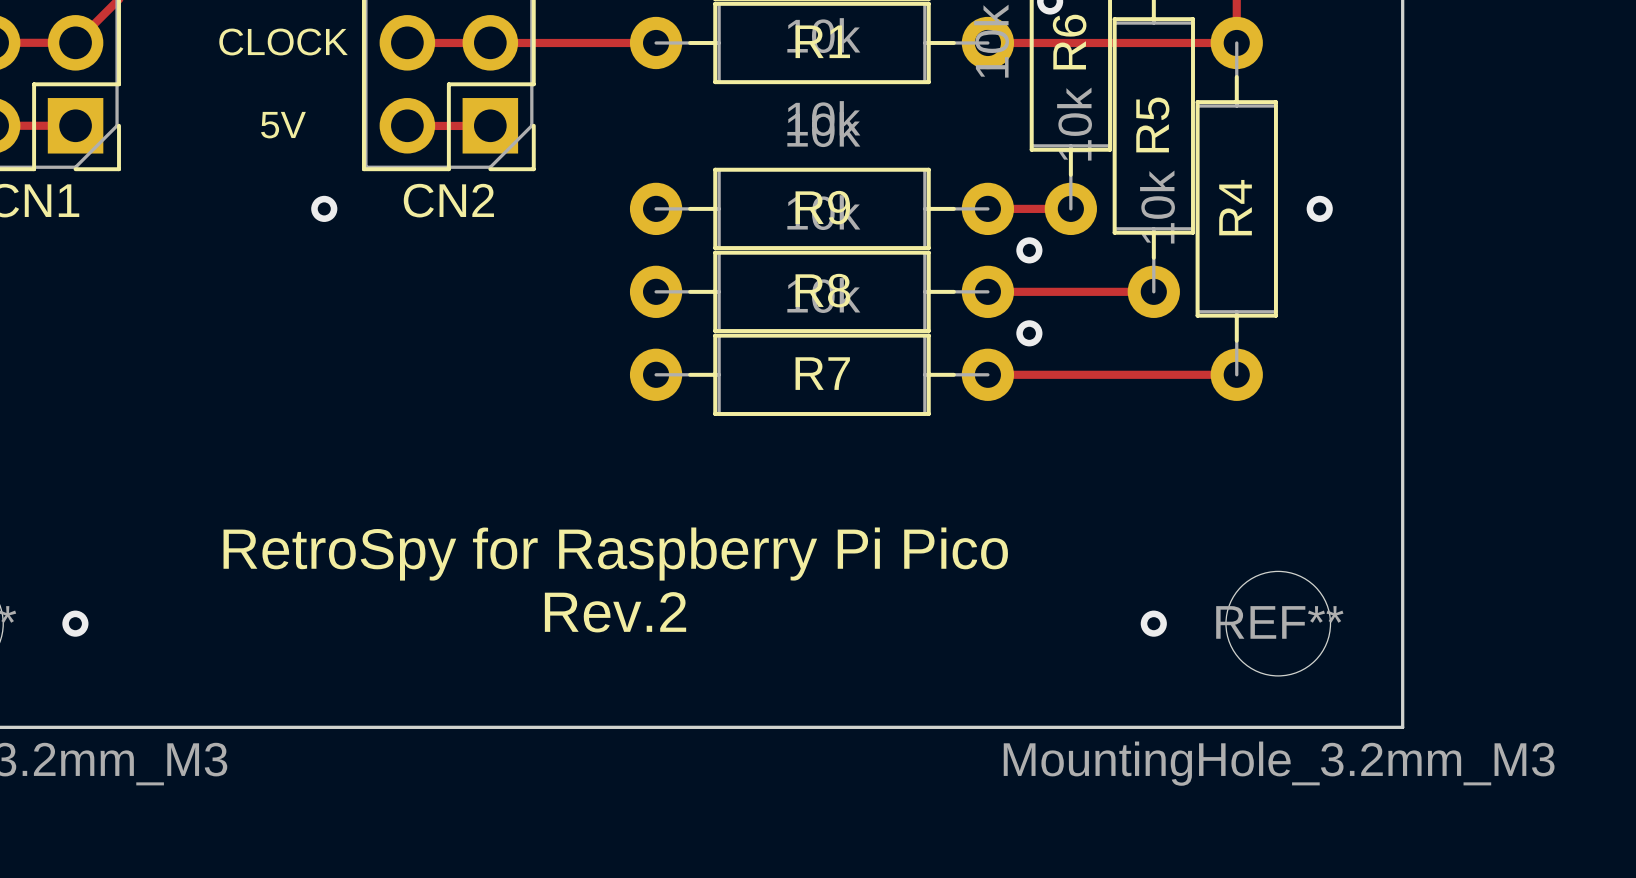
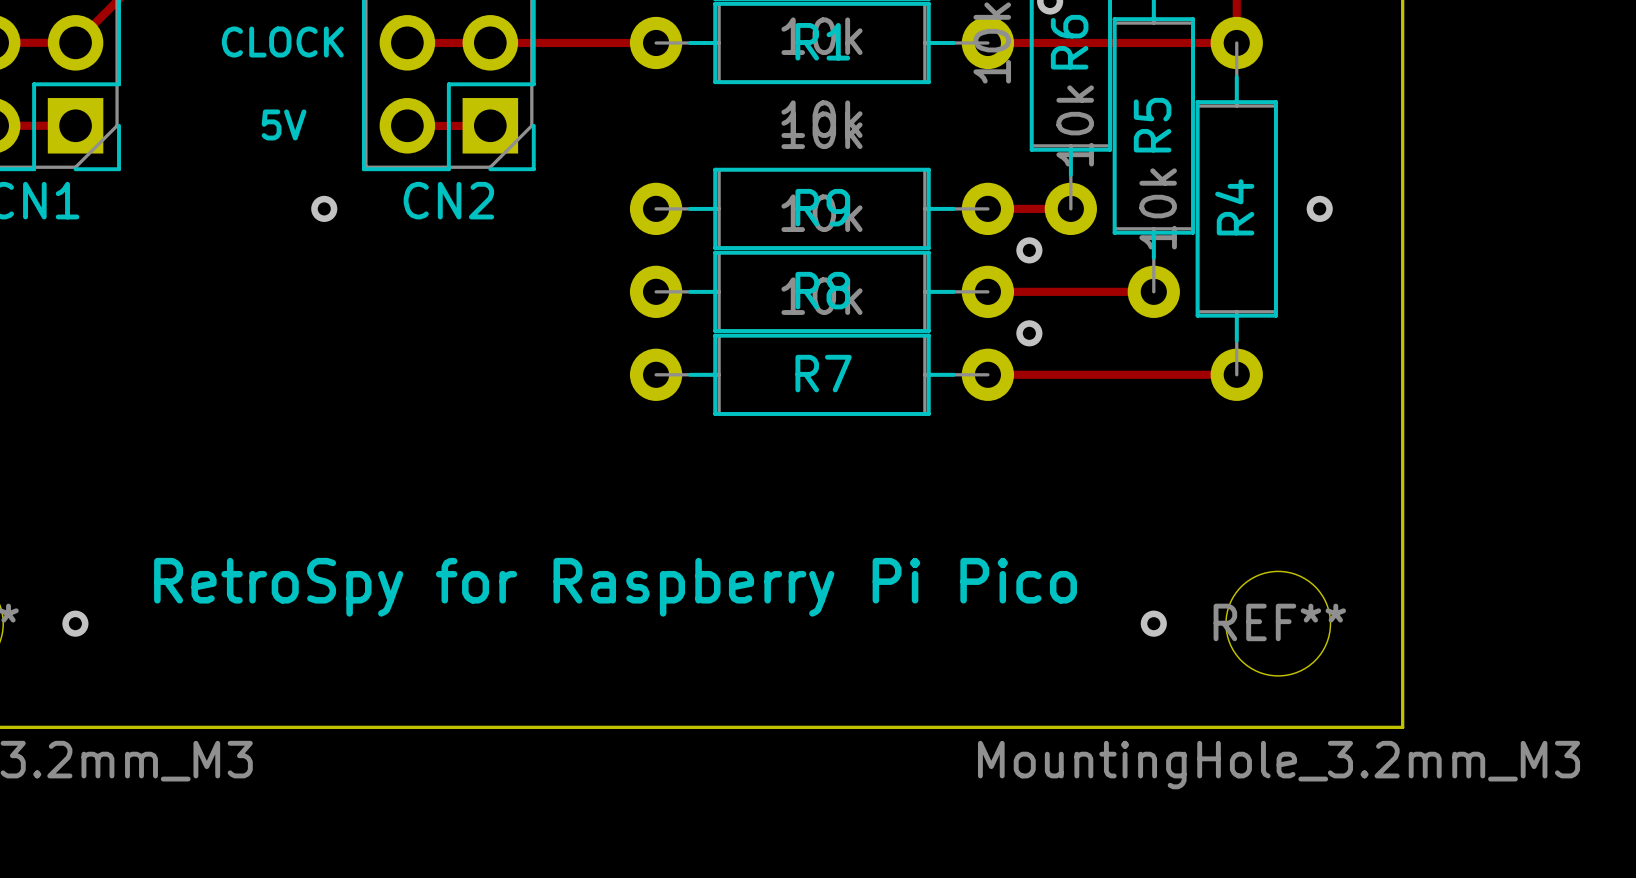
text position: RetroSpy for Raspberry Pi Pico (615, 554) -> RetroSpy for Raspberry Pi Pico (615, 587)
text: Rev.2 (615, 612) -> none

